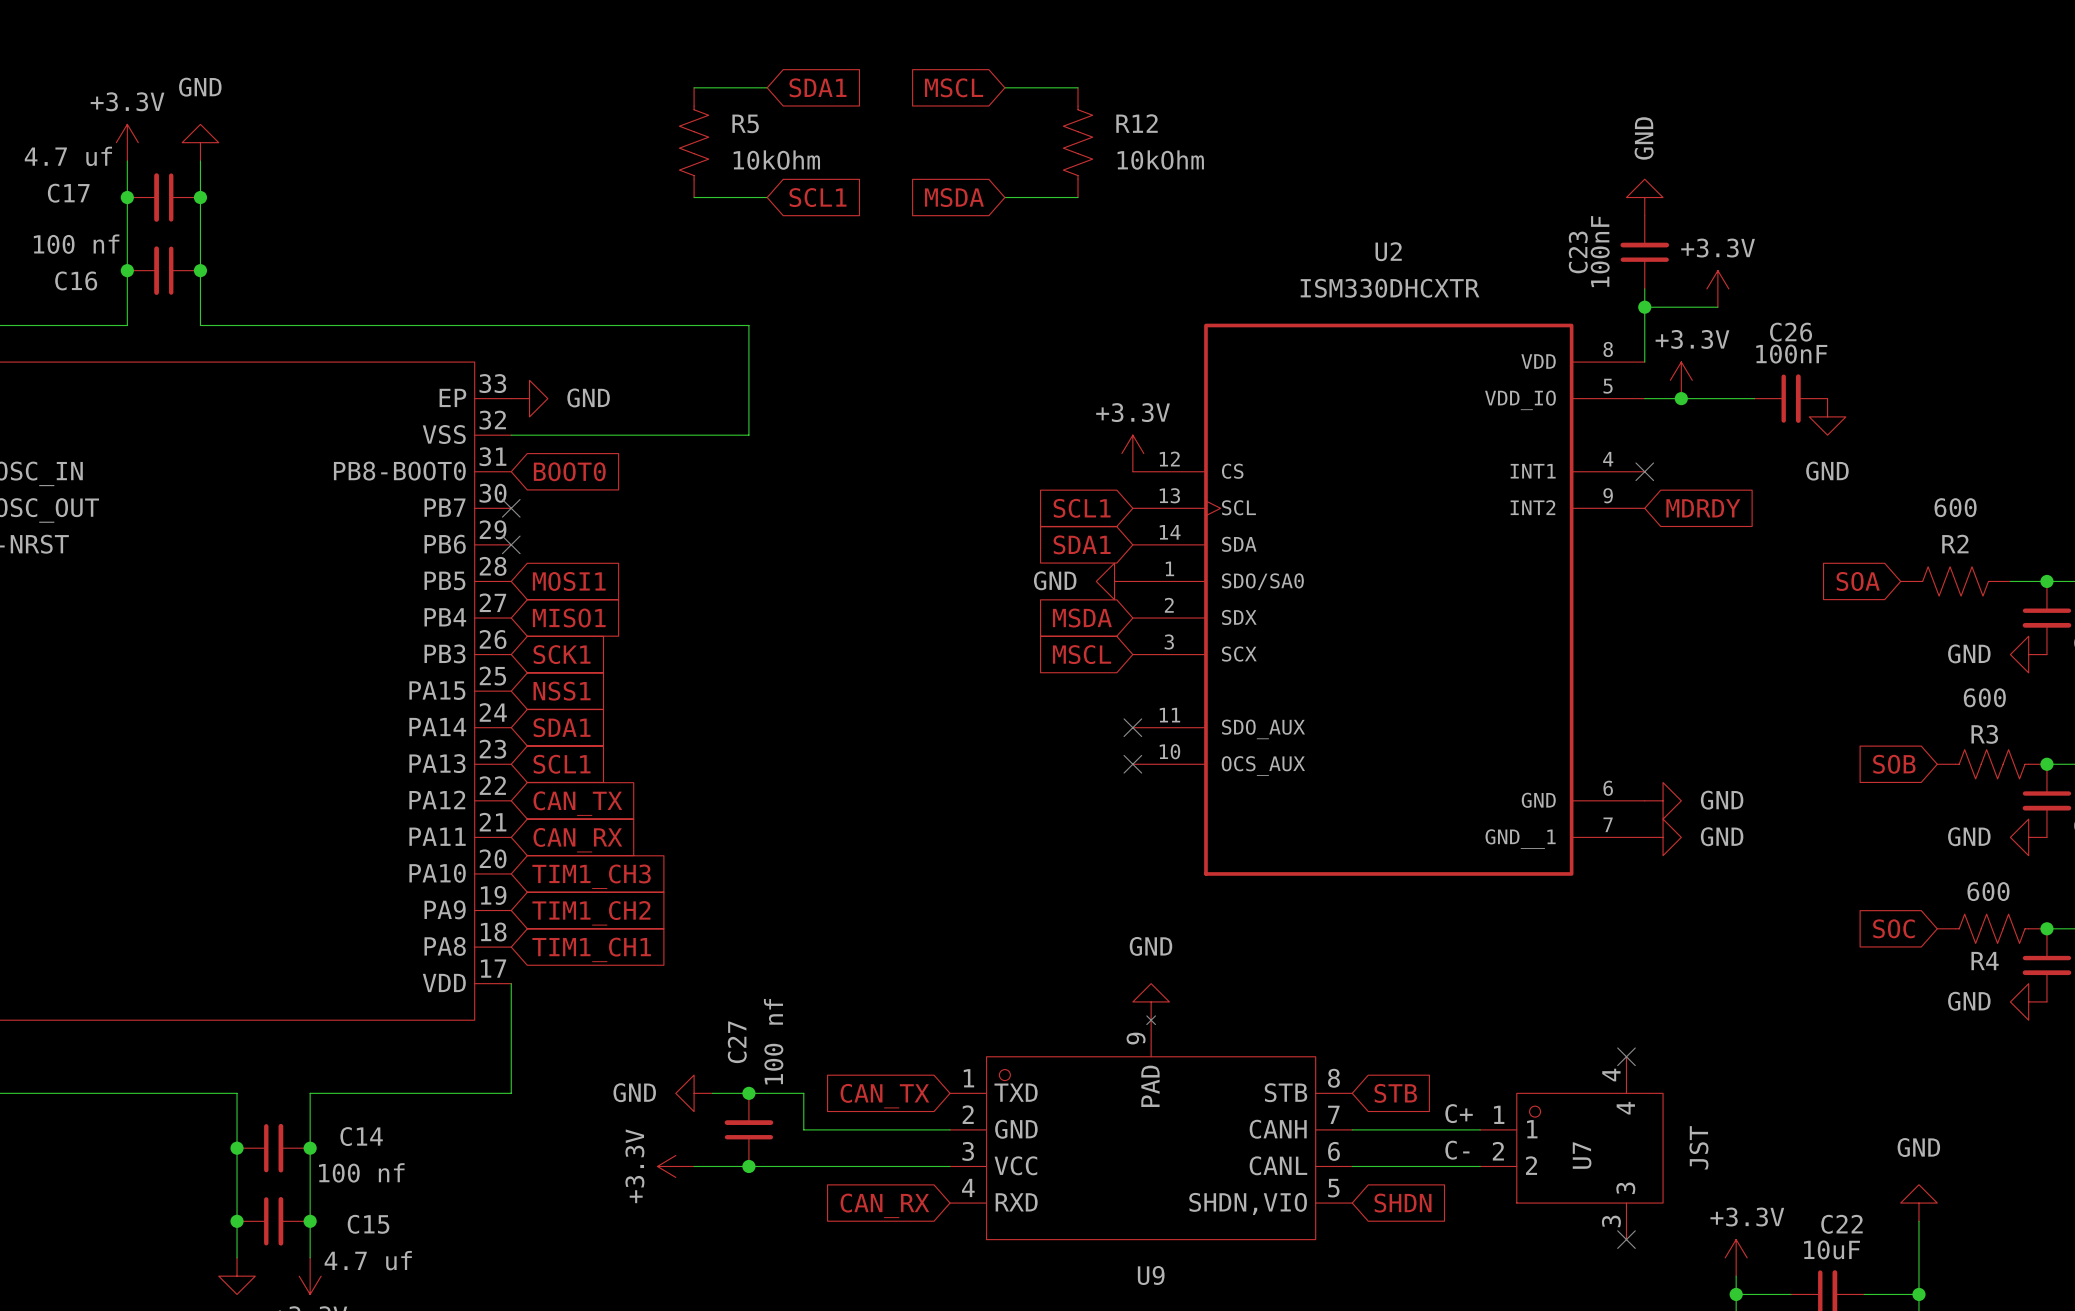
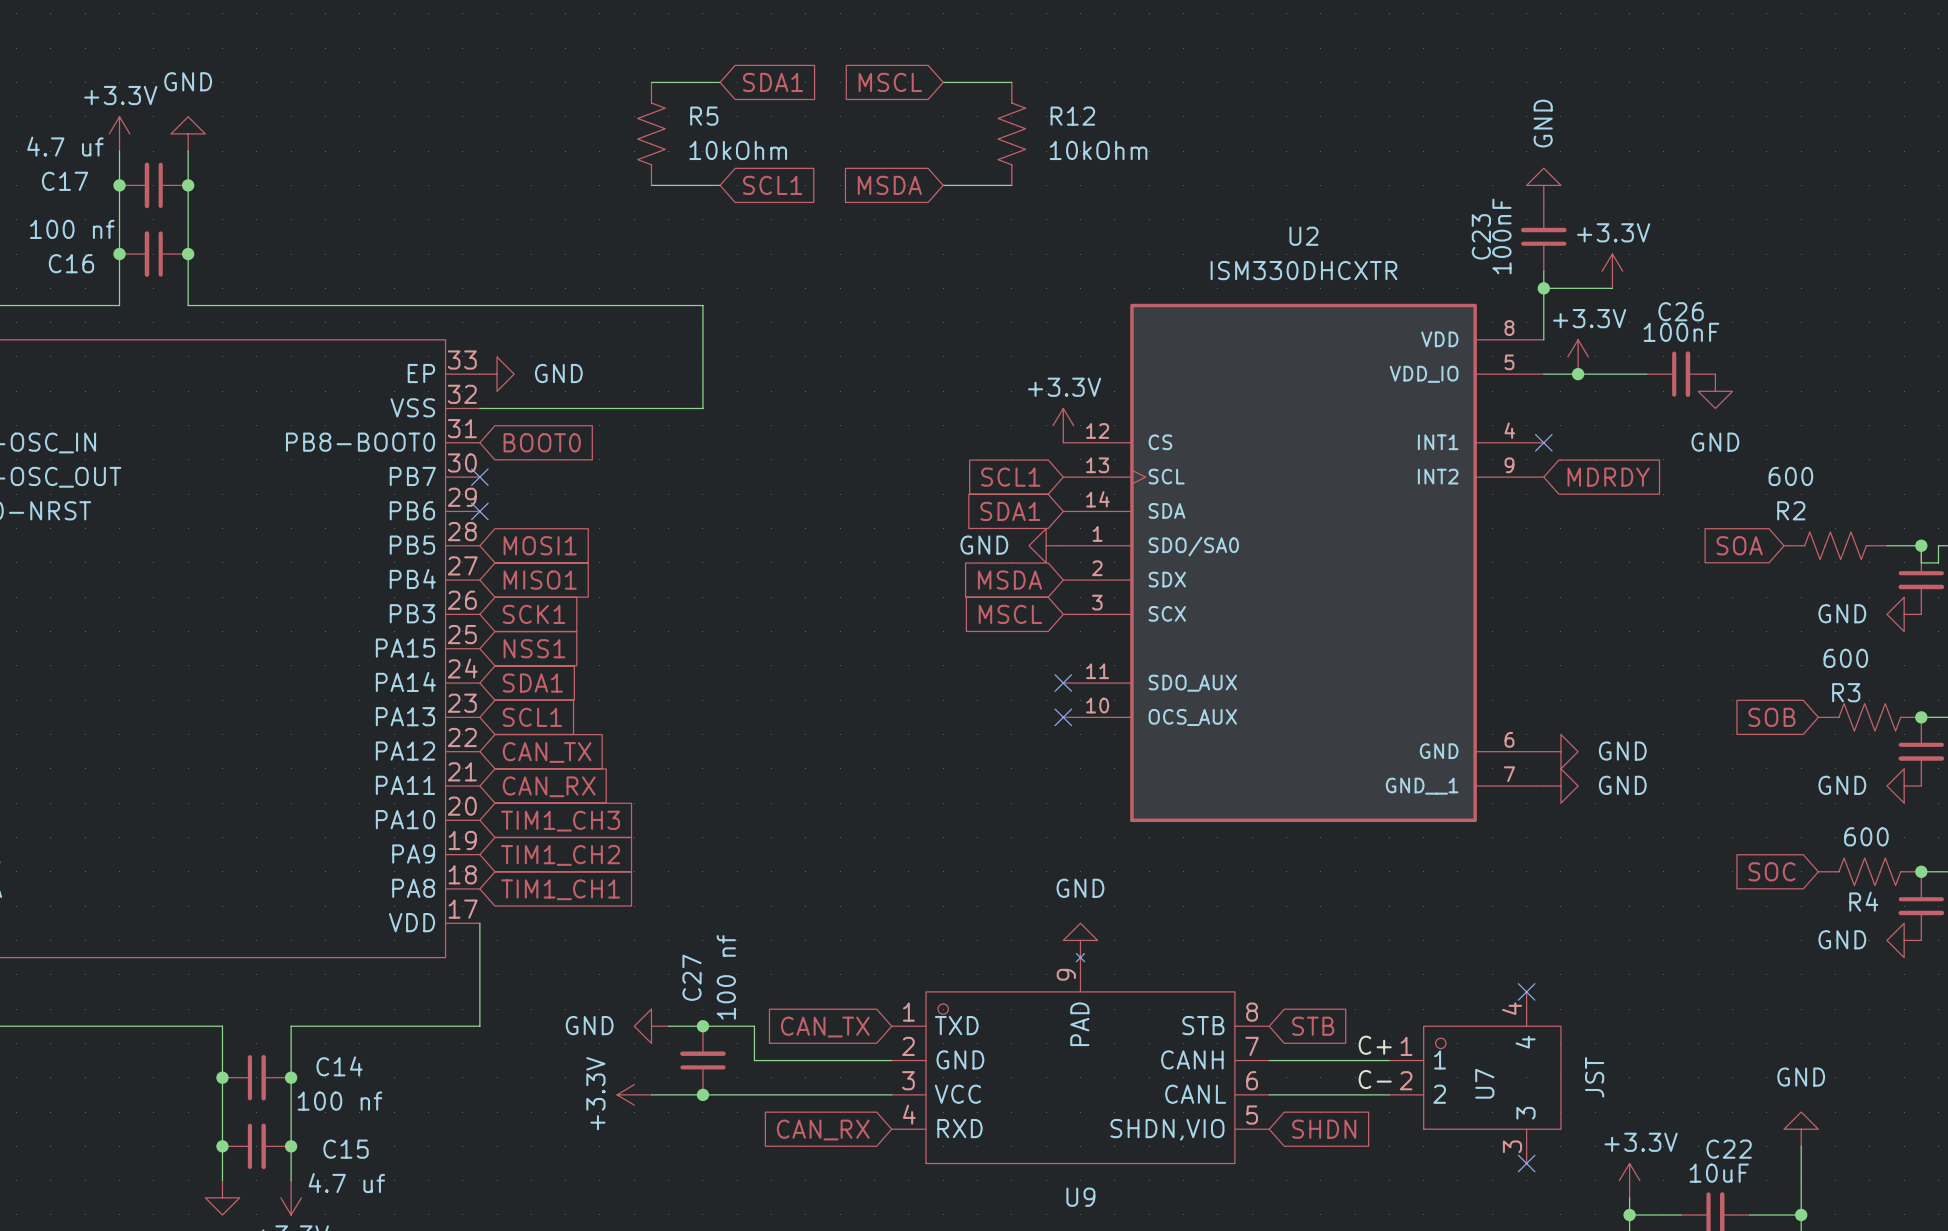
R2 value position: 600 (1955, 507) -> 600 (1790, 476)
R2 name position: R2 (1955, 544) -> R2 (1791, 510)
wire: (2046, 581) (2065, 581) -> (1921, 545) (1921, 562) (1938, 562) (1938, 545)
R3 value position: 600 (1984, 697) -> 600 (1845, 658)
R3 name position: R3 (1984, 734) -> R3 (1846, 692)

